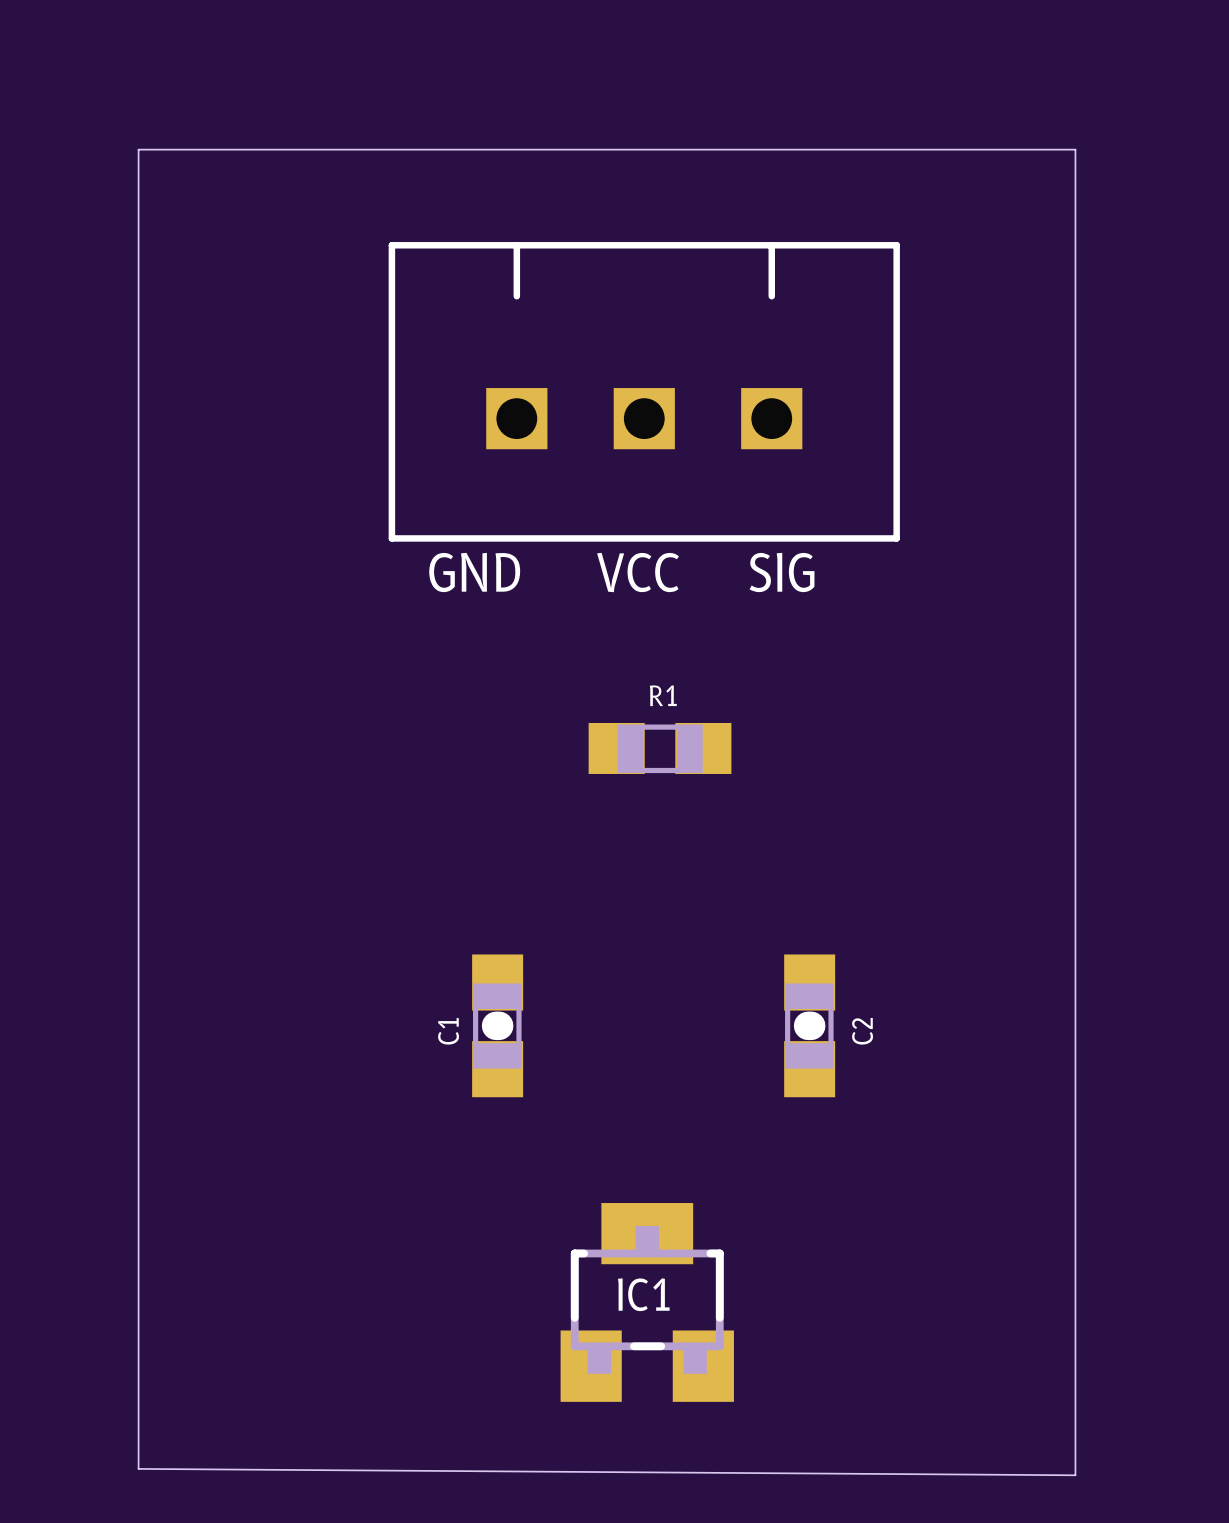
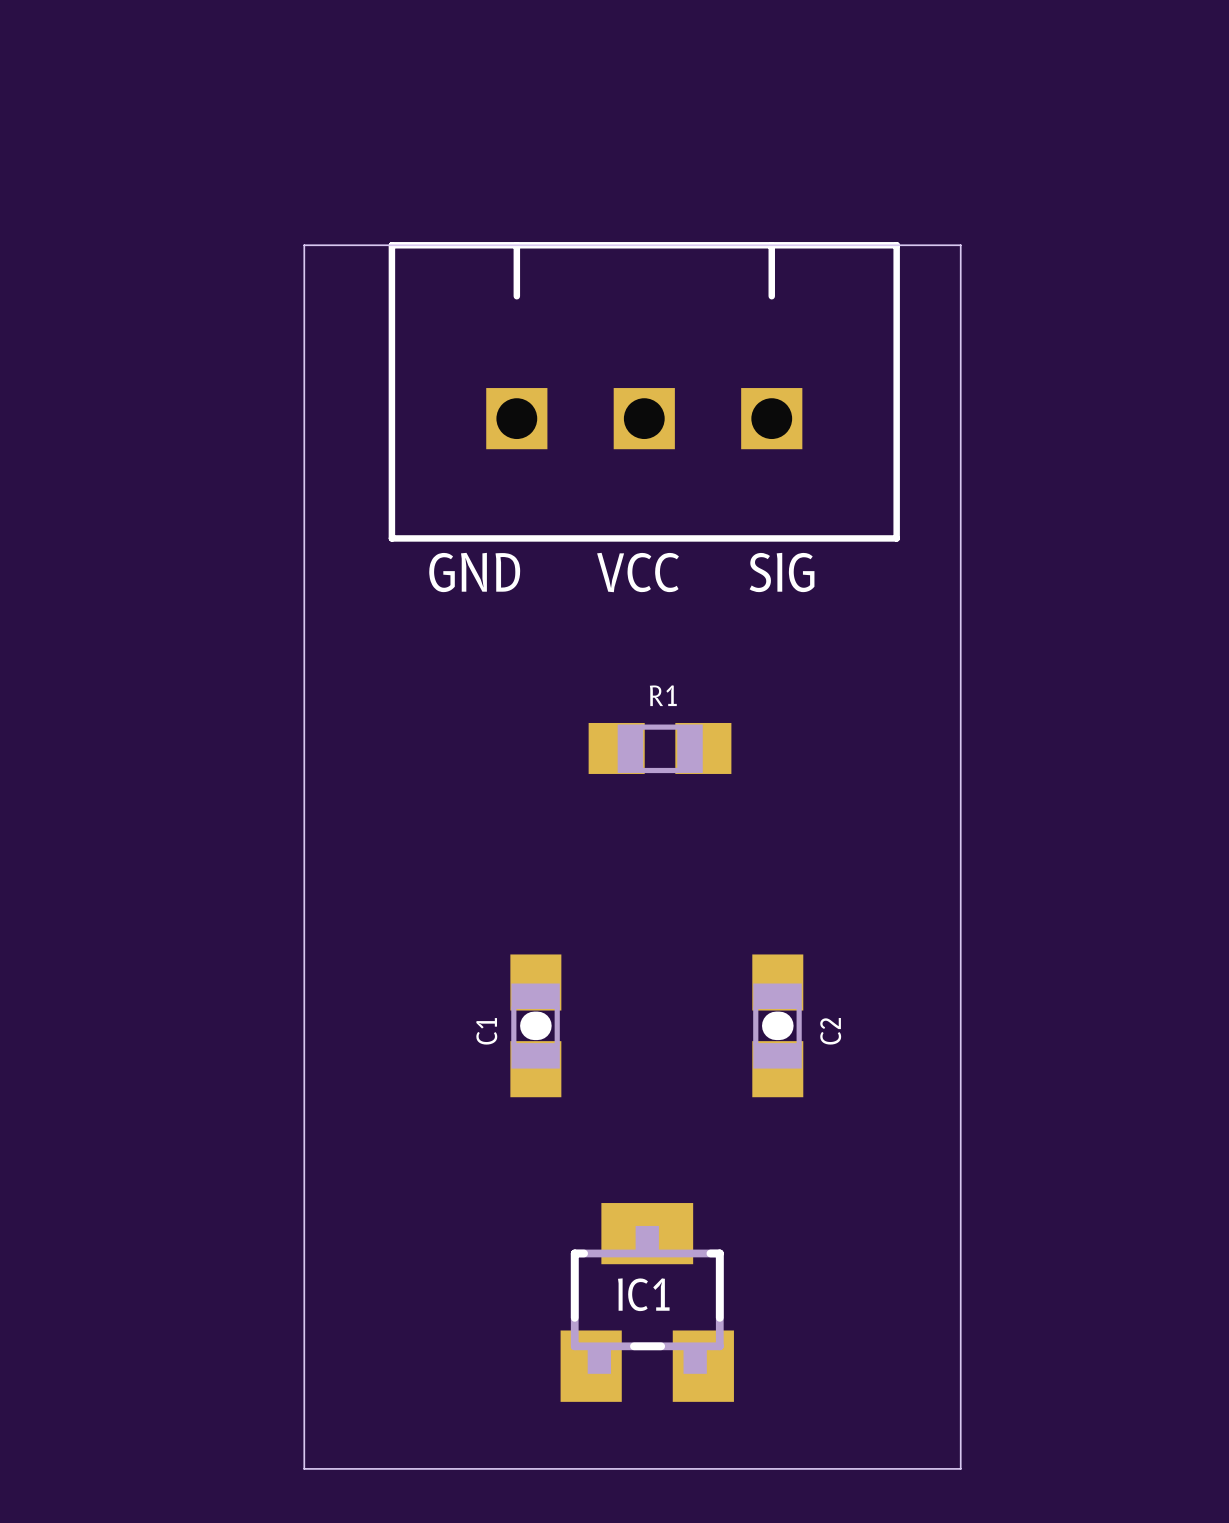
board edge: (138, 149) (138, 1468) (1075, 1475) (1075, 149) (138, 149) -> (304, 245) (304, 1468) (960, 1468) (960, 245) (304, 245)
C1 position: (497, 1025) -> (535, 1025)
C2 position: (809, 1025) -> (777, 1025)

